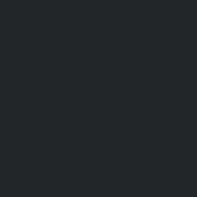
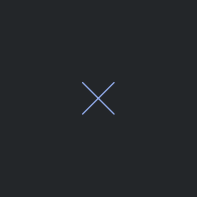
no-connect mark: none -> (98, 98)

